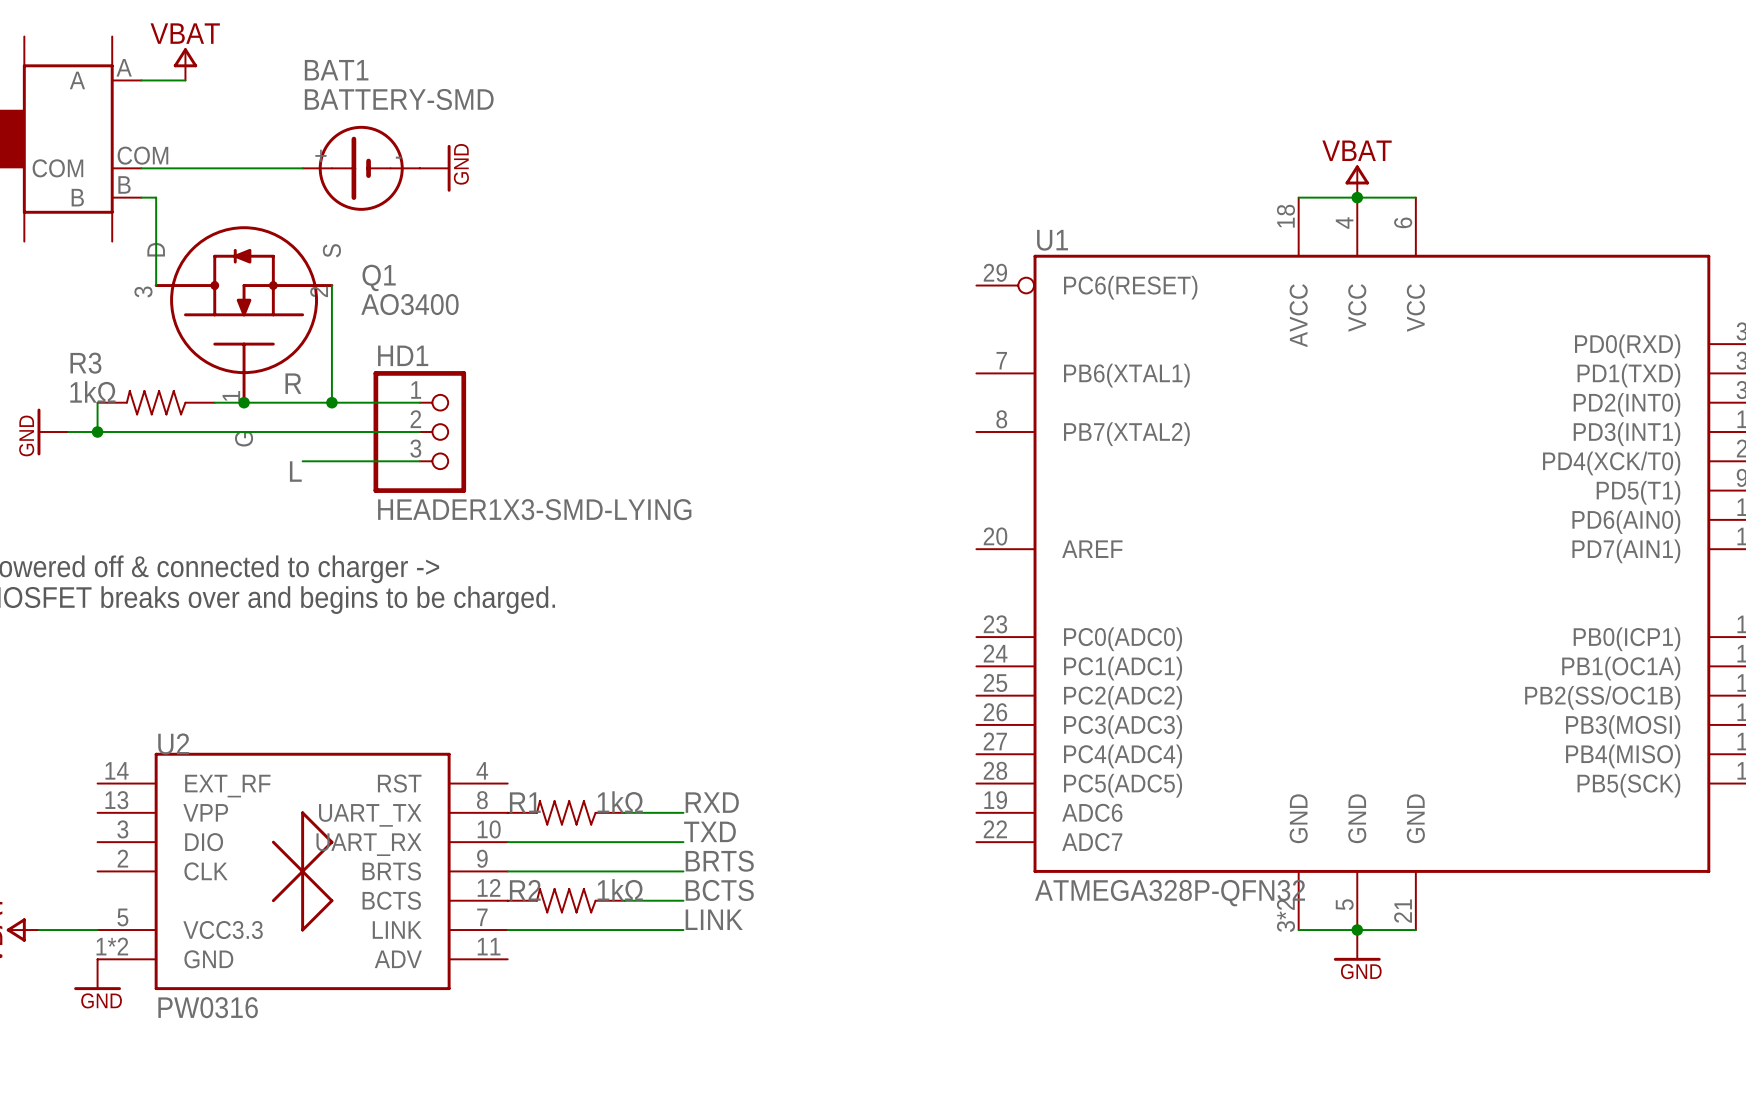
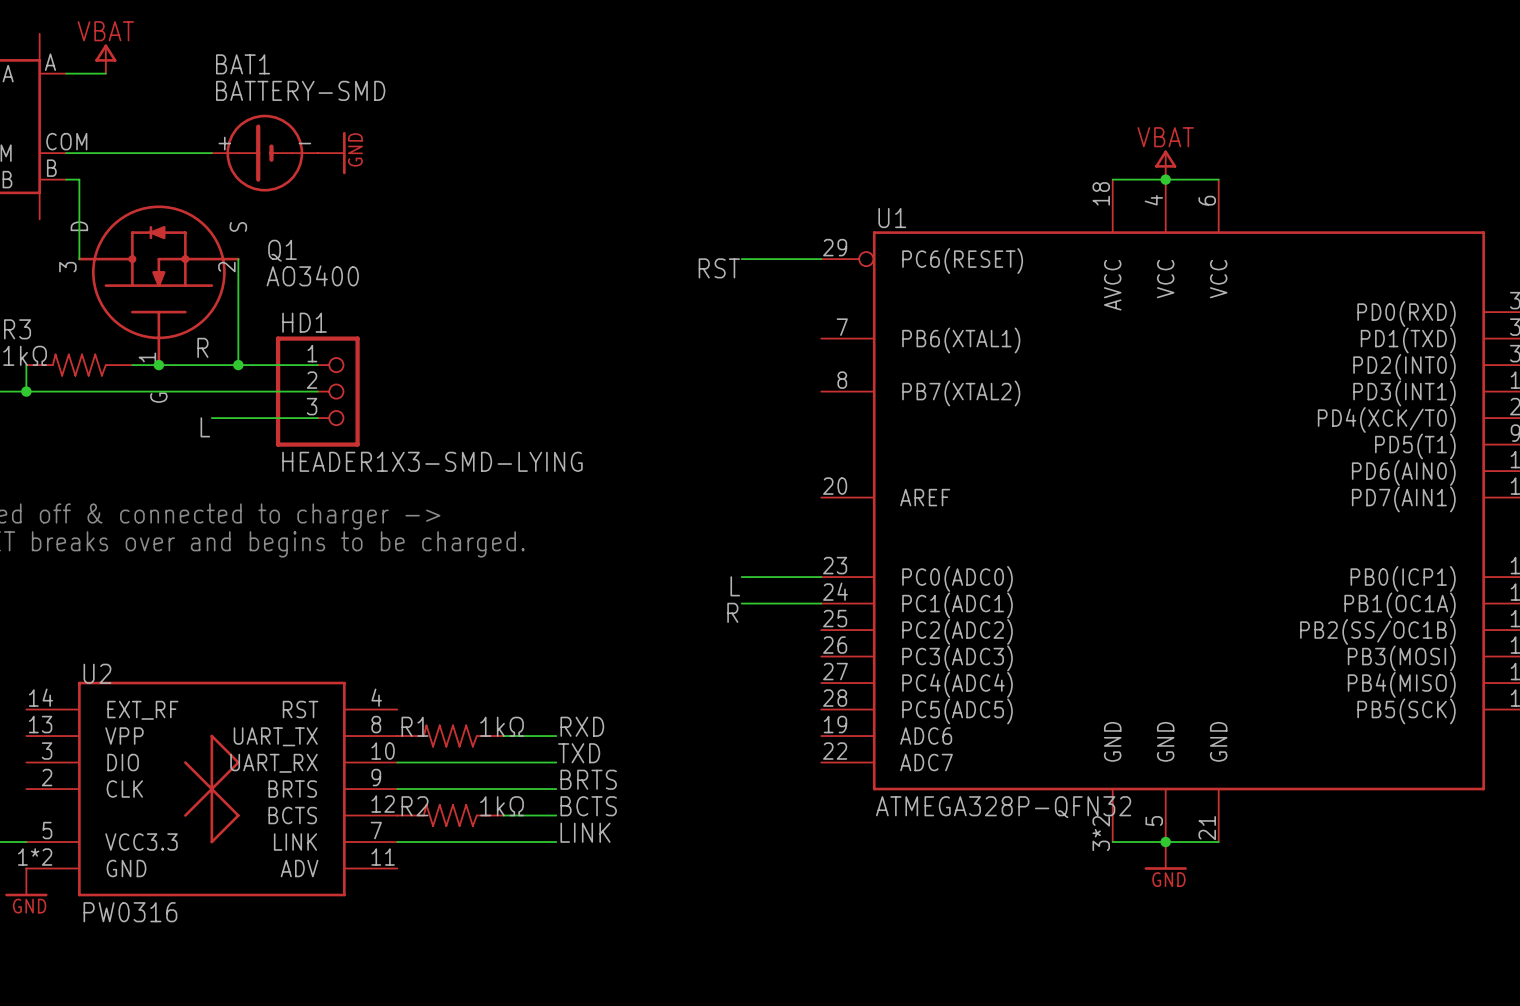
wire: none -> (741, 259) (821, 259)
label: none -> RST (719, 268)
wire: none -> (741, 577) (821, 577)
label: none -> L (735, 586)
wire: none -> (741, 603) (821, 603)
label: none -> R (732, 612)

